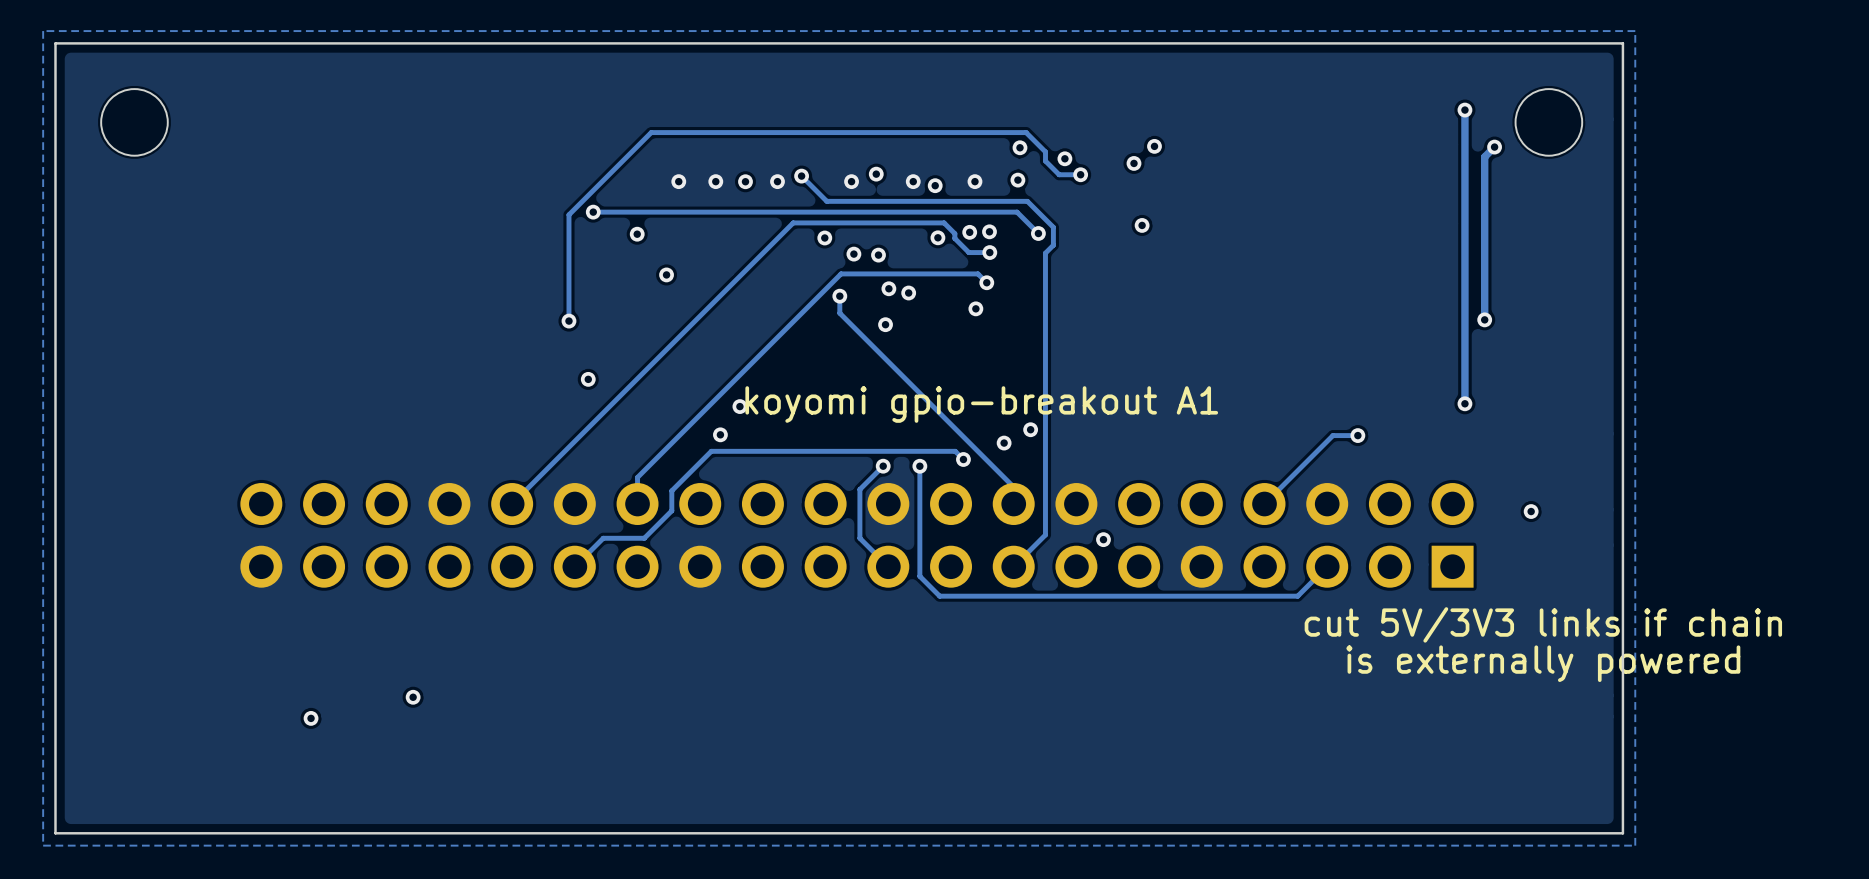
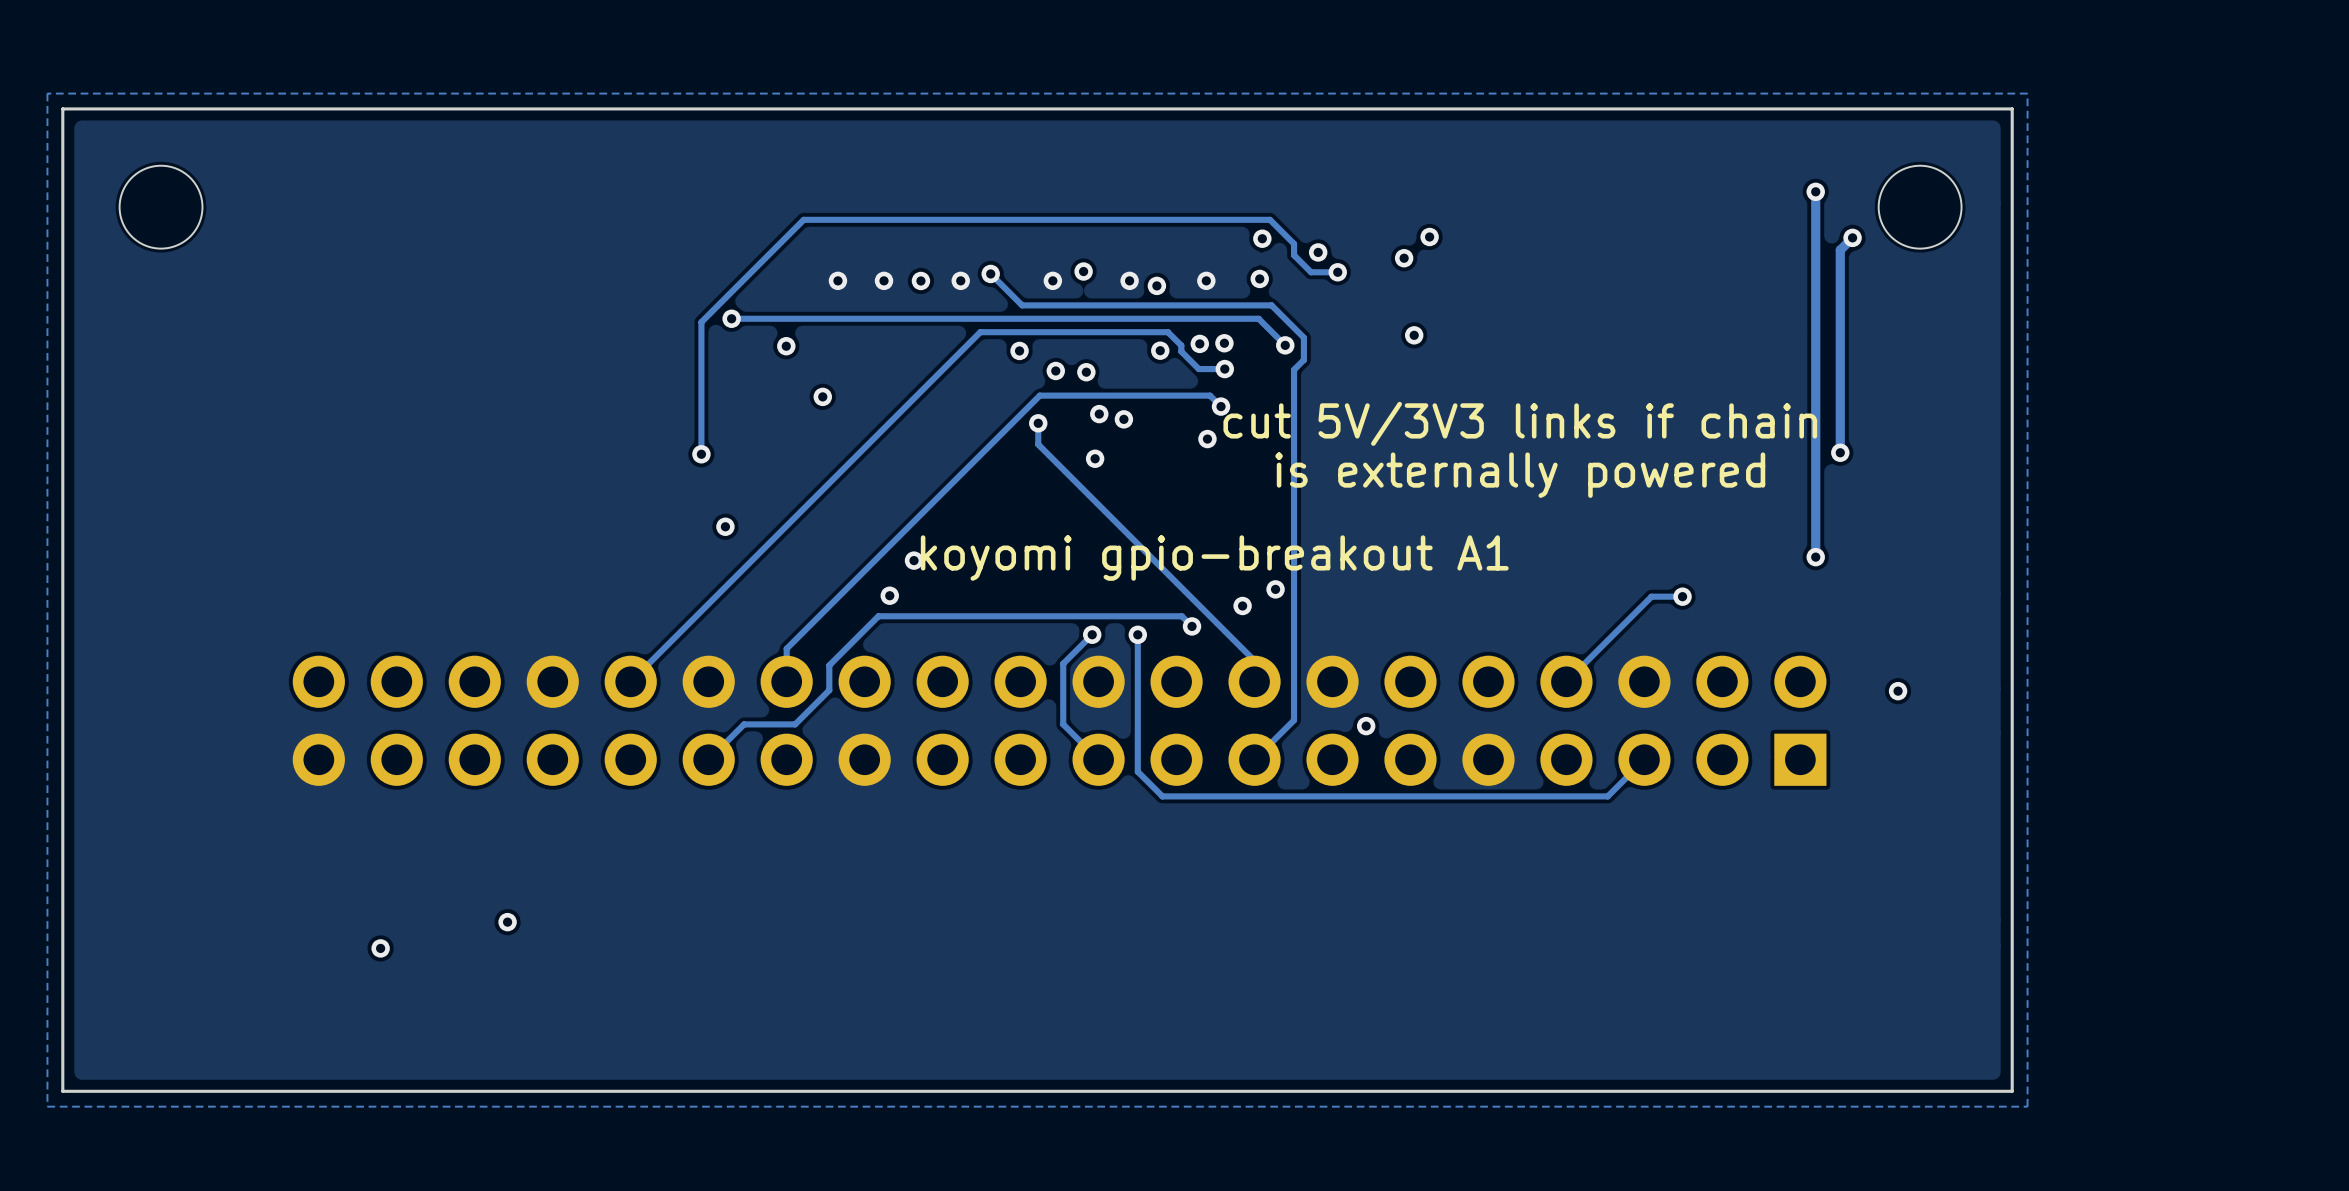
text position: cut 5V/3V3 links if chain (1543, 624) -> cut 5V/3V3 links if chain (1520, 423)
text position: is externally powered (1543, 663) -> is externally powered (1520, 475)

